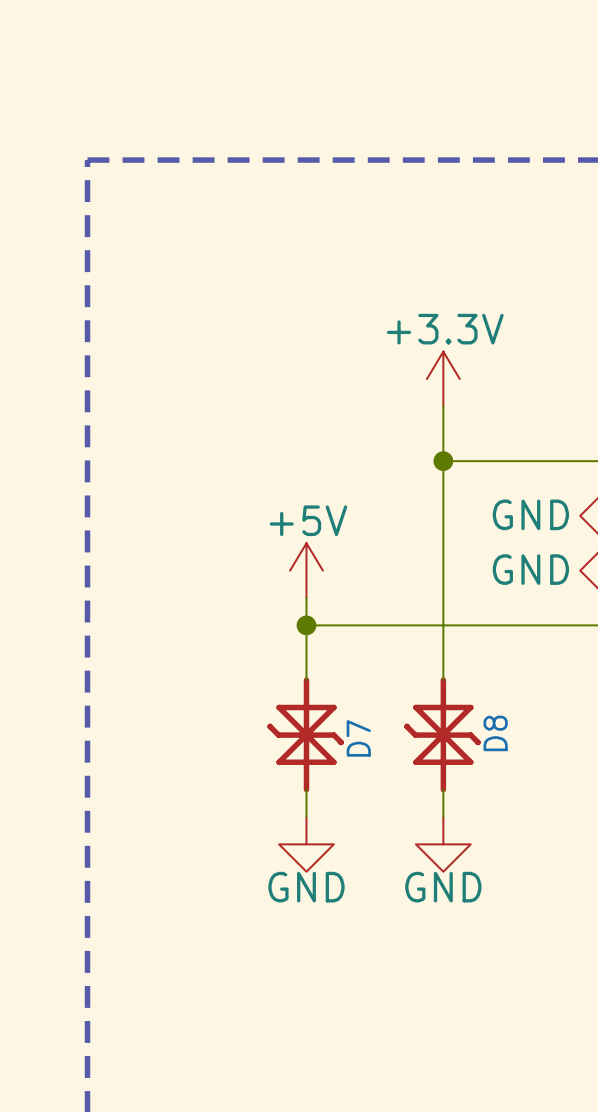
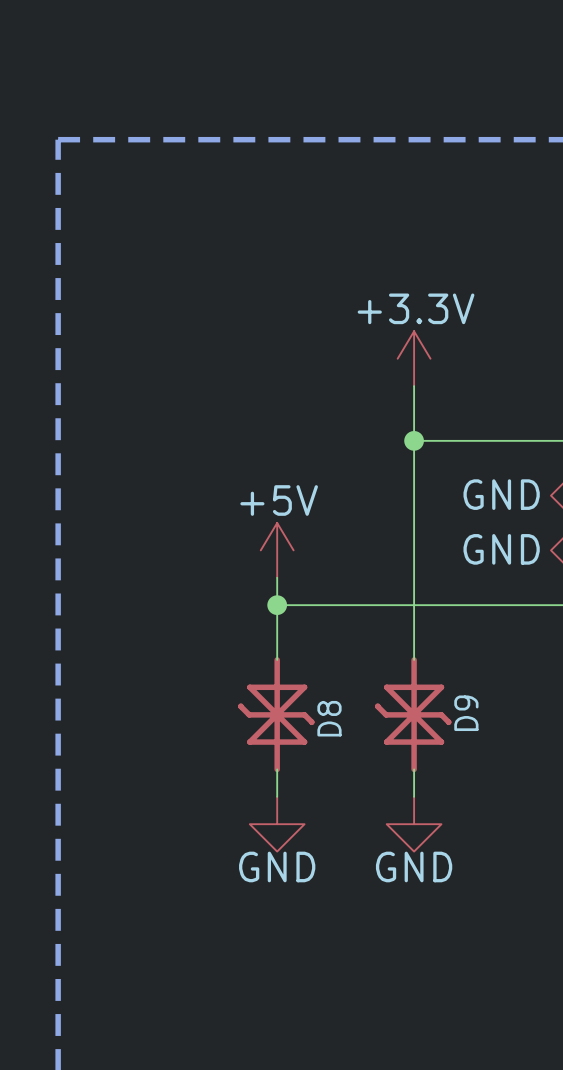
D8 name: D8 (495, 733) -> D9 (466, 713)
D7 name: D7 (358, 738) -> D8 (329, 718)

